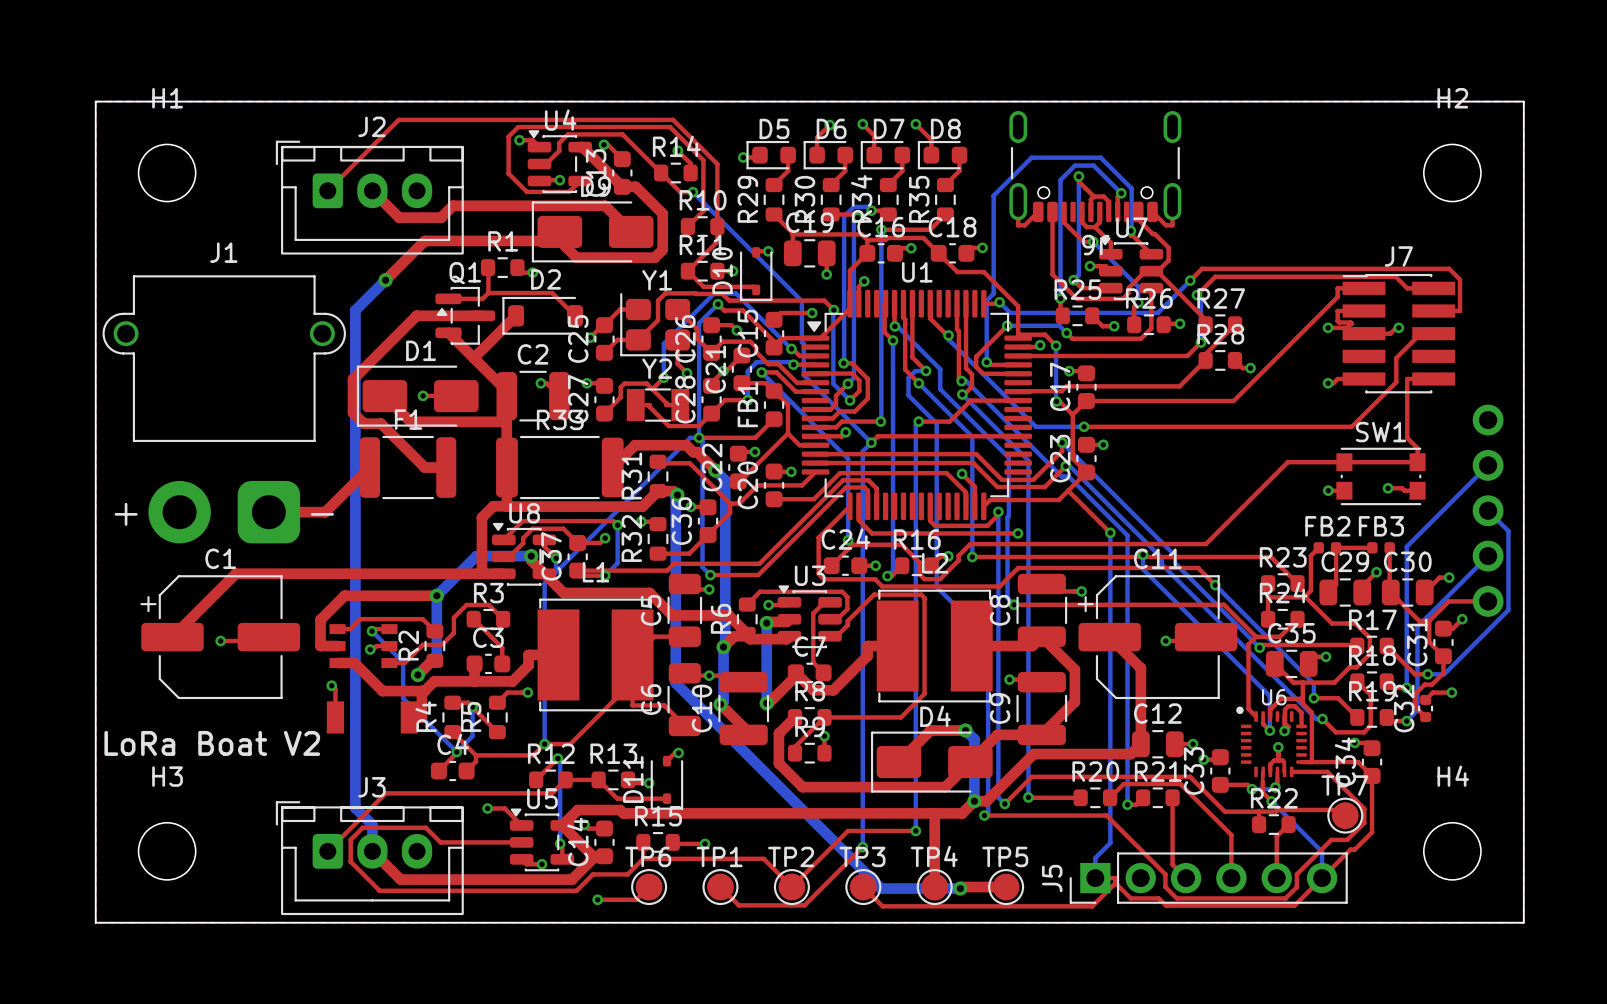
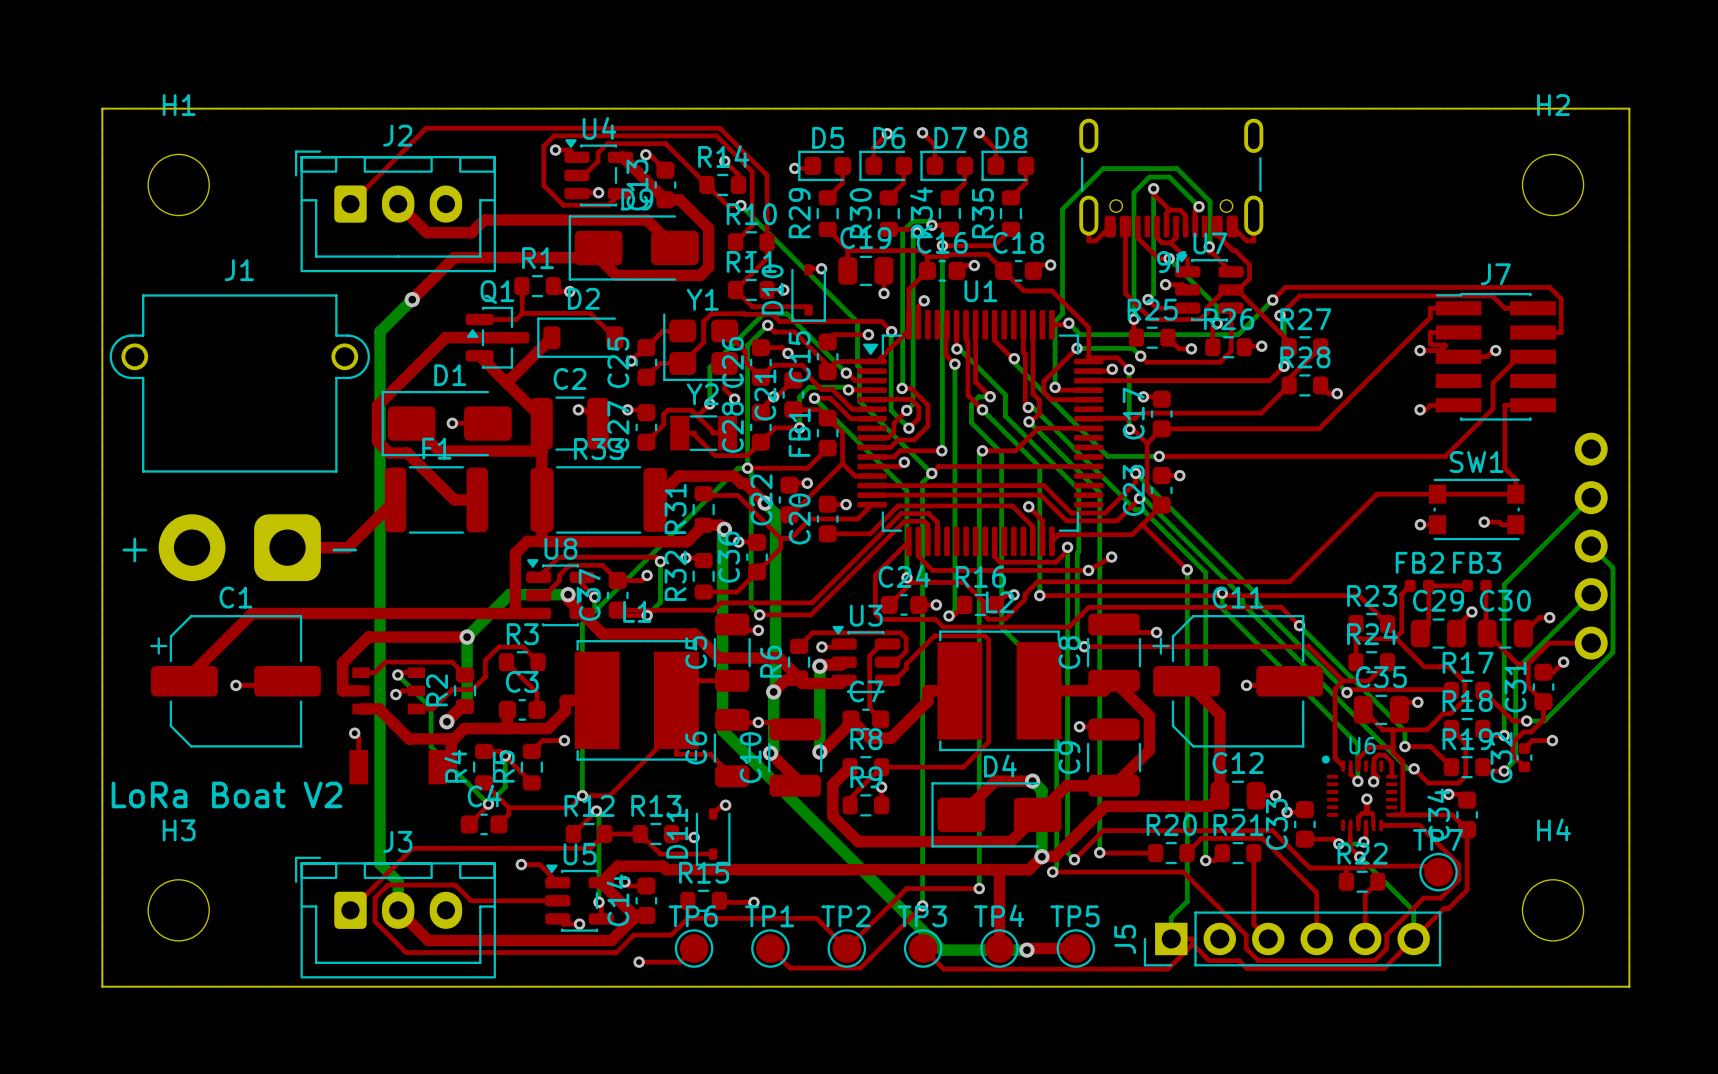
top track: none -> (1111, 557) (1088, 570)
via: none -> (1111, 557)

